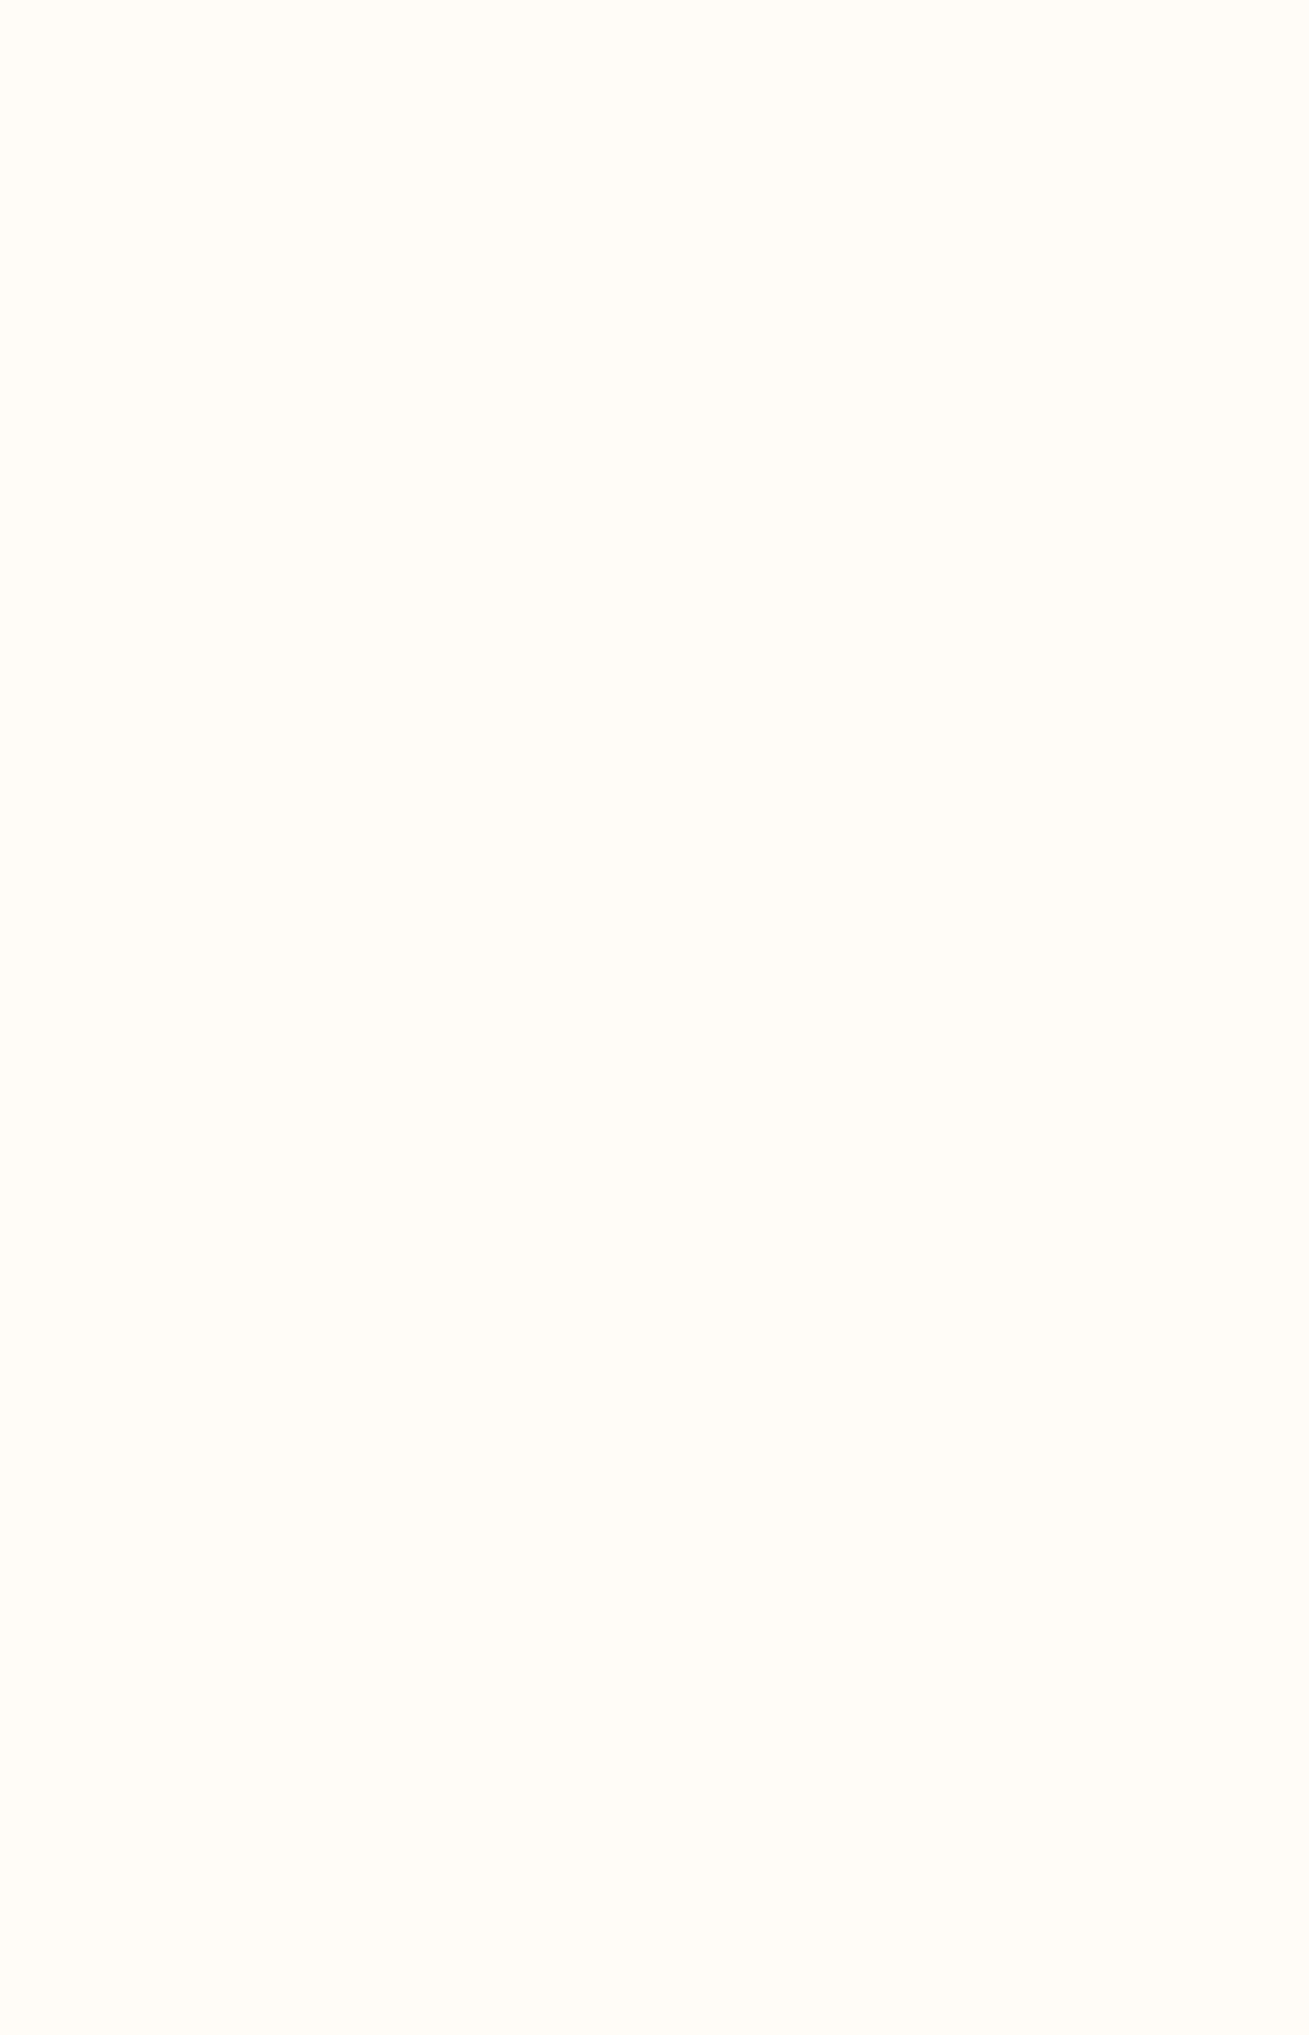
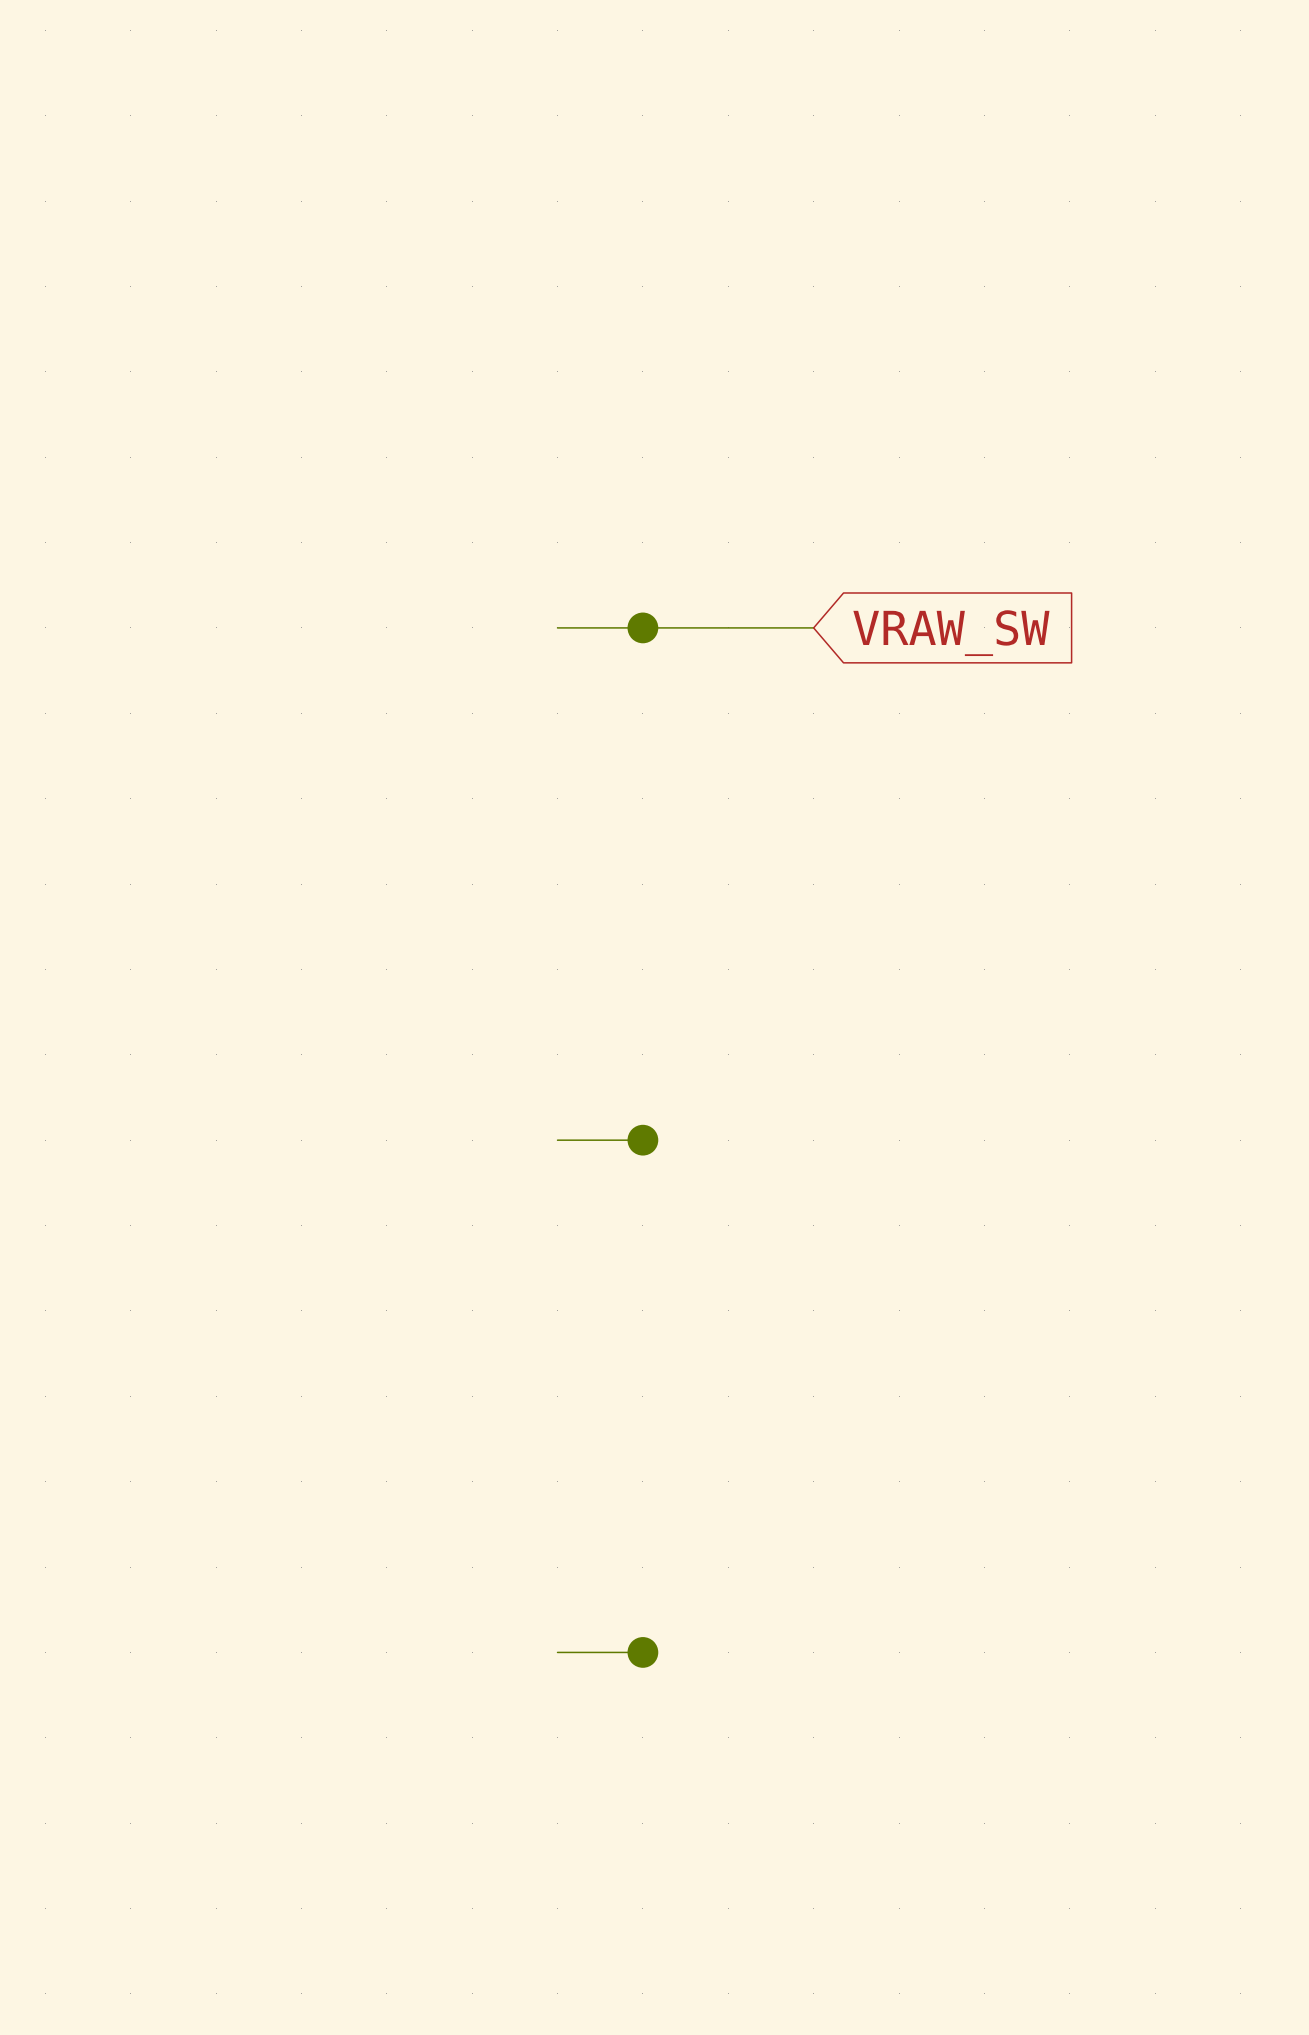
wire: none -> (557, 627) (813, 627)
junction: none -> (642, 627)
global label: none -> VRAW_SW (951, 633)
wire: none -> (557, 1140) (642, 1140)
junction: none -> (642, 1140)
wire: none -> (557, 1652) (642, 1652)
junction: none -> (642, 1652)

